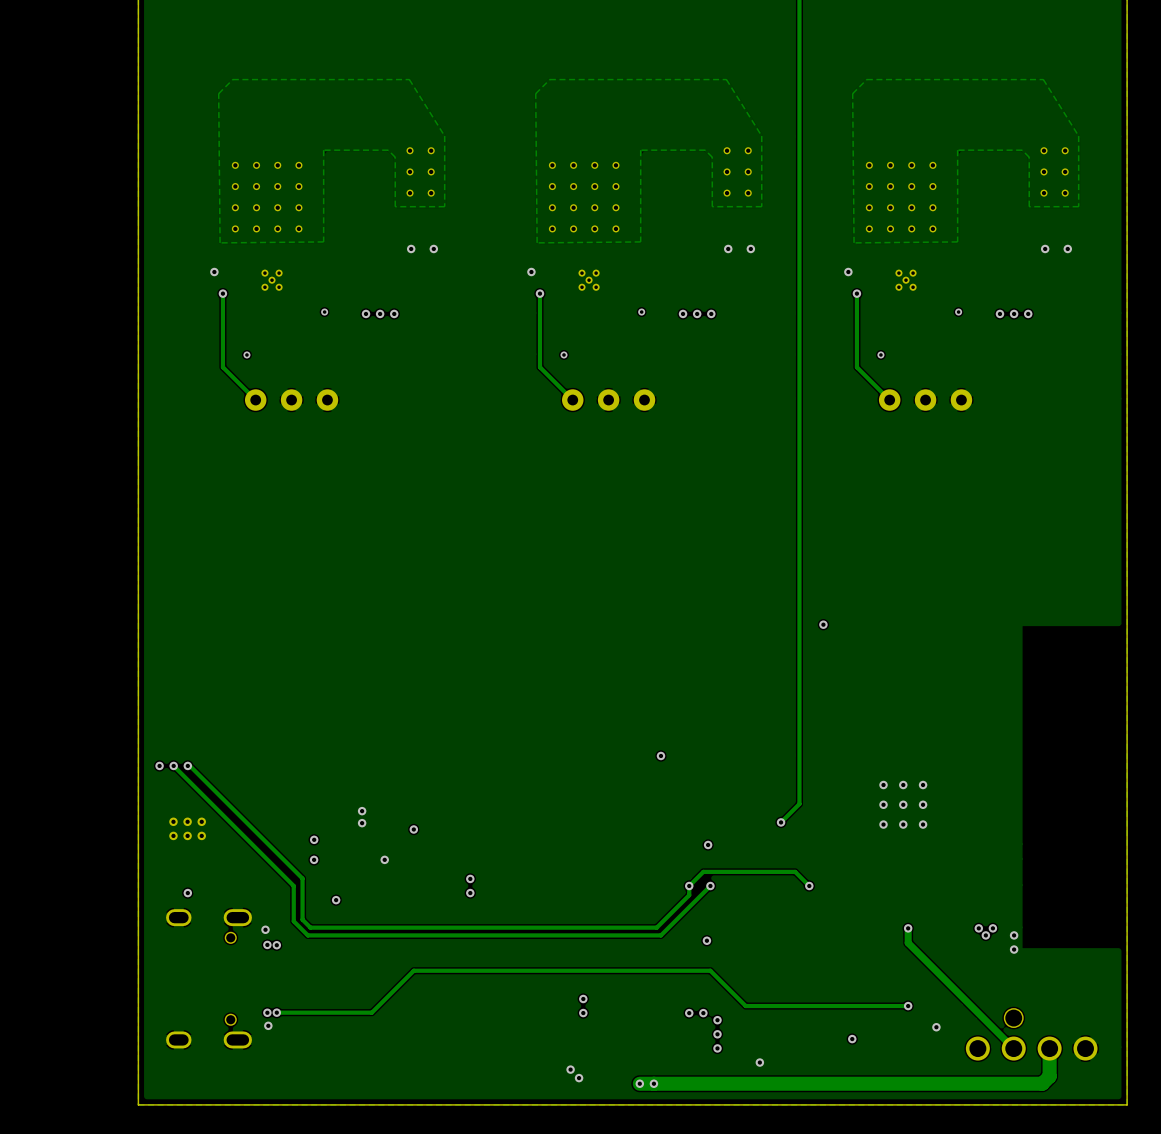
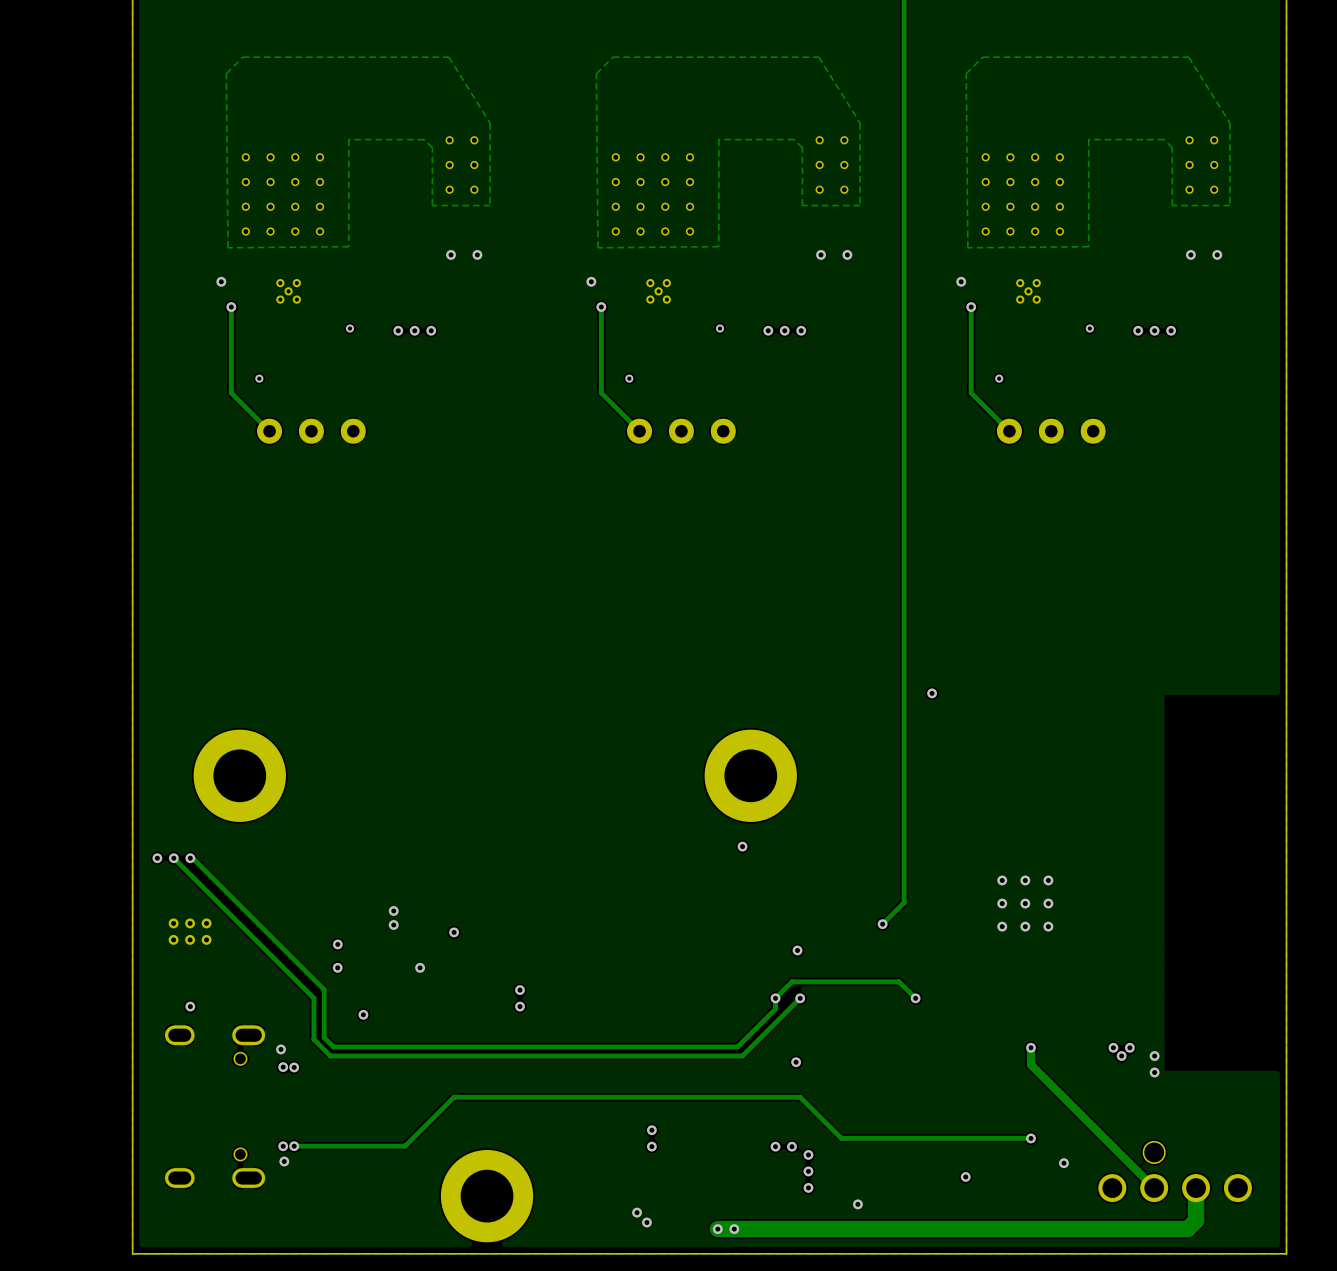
part: none -> (239, 775)
part: none -> (750, 775)
part: none -> (487, 1196)

